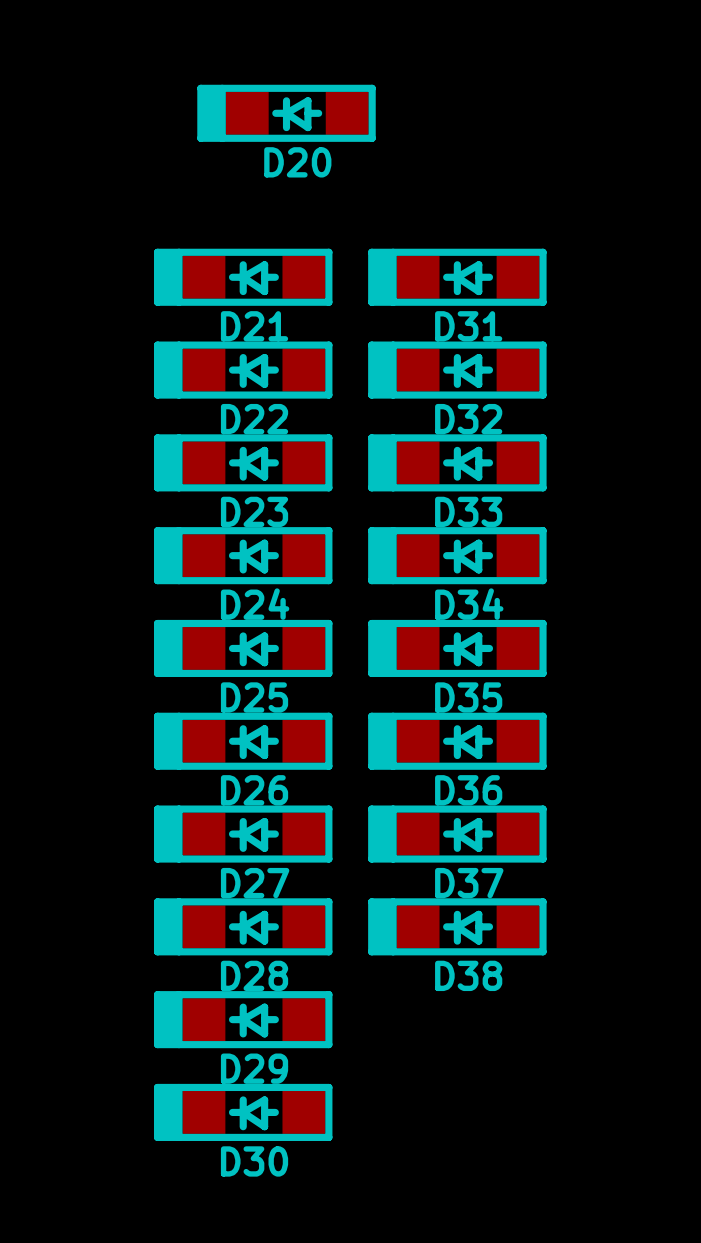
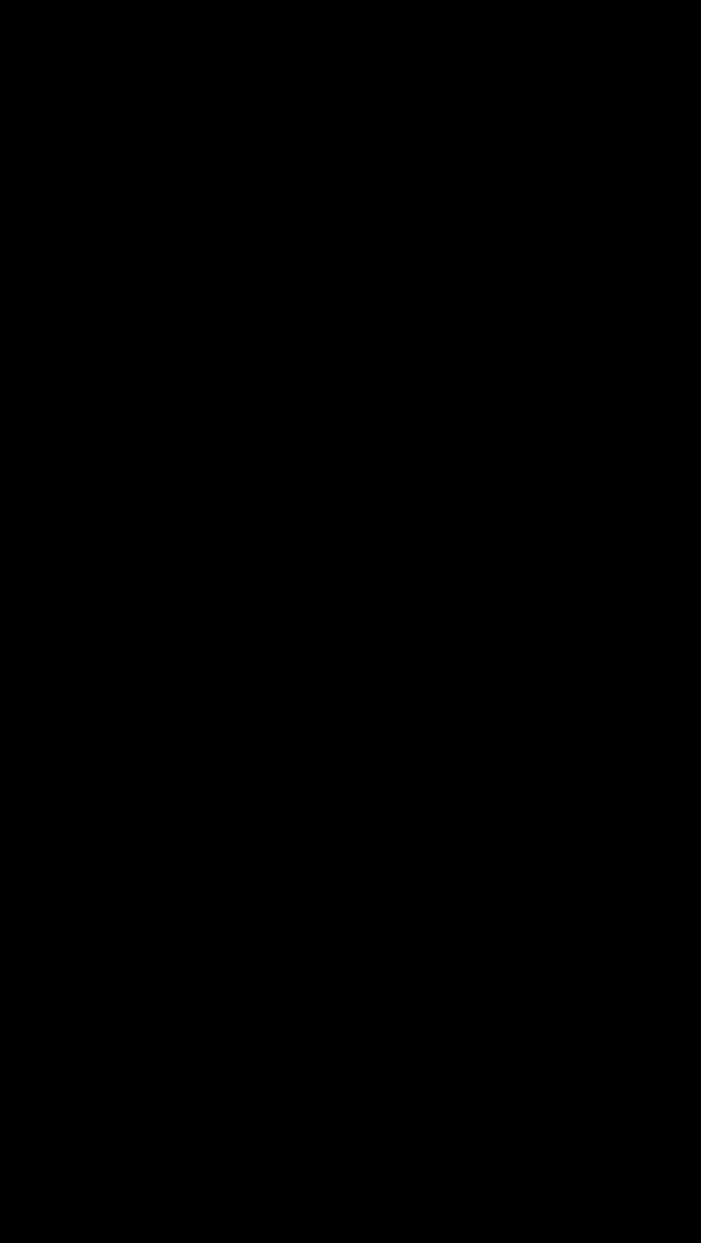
D20: (286, 113) -> none
D21: (243, 277) -> none
D31: (457, 277) -> none
D22: (243, 370) -> none
D32: (457, 370) -> none
D23: (243, 462) -> none
D33: (457, 462) -> none
D24: (243, 555) -> none
D34: (457, 555) -> none
D25: (243, 648) -> none
D35: (457, 648) -> none
D26: (243, 741) -> none
D36: (457, 741) -> none
D27: (243, 834) -> none
D37: (457, 834) -> none
D28: (243, 926) -> none
D38: (457, 926) -> none
D29: (243, 1019) -> none
D30: (243, 1112) -> none

